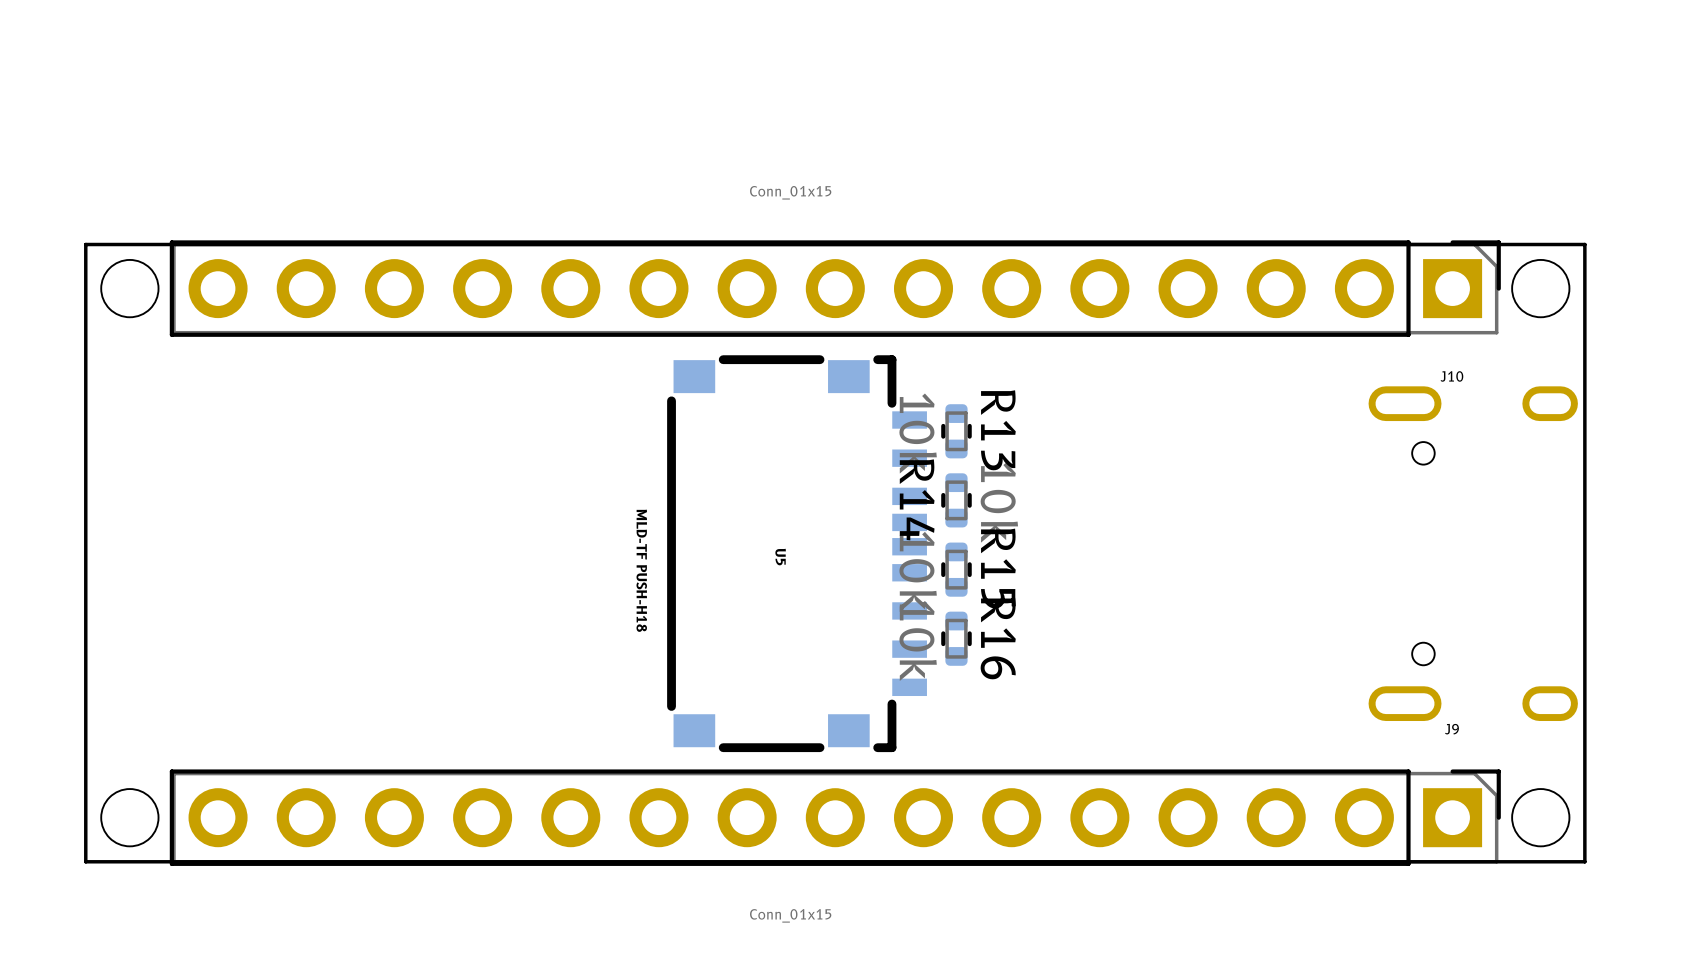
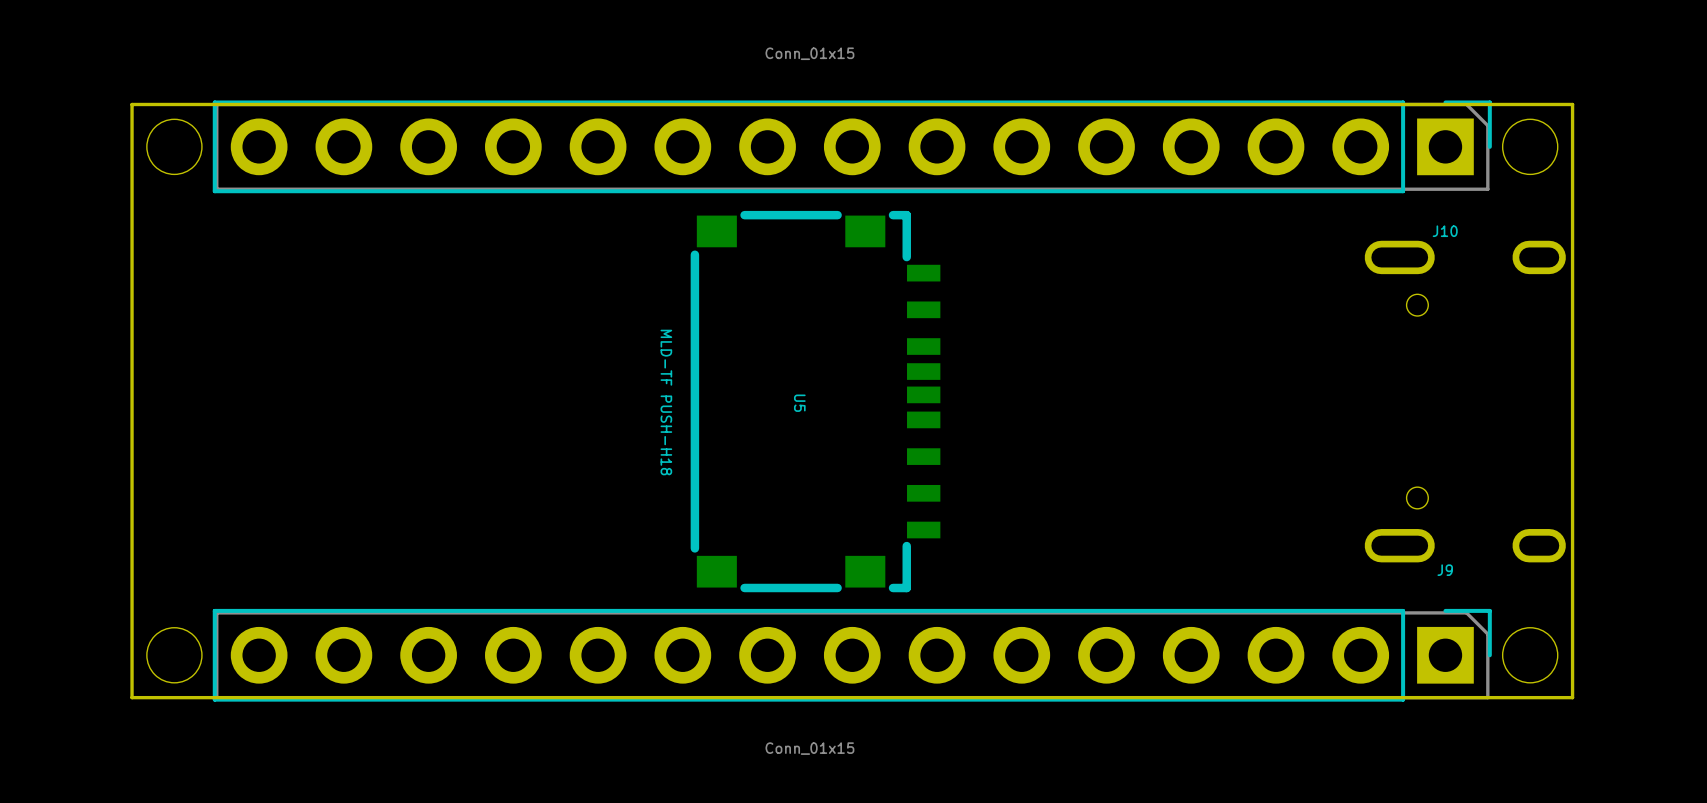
R13: 10k (956, 431) -> none
R14: 10k (956, 500) -> none
R15: 10k (956, 569) -> none
R16: 10k (956, 638) -> none

